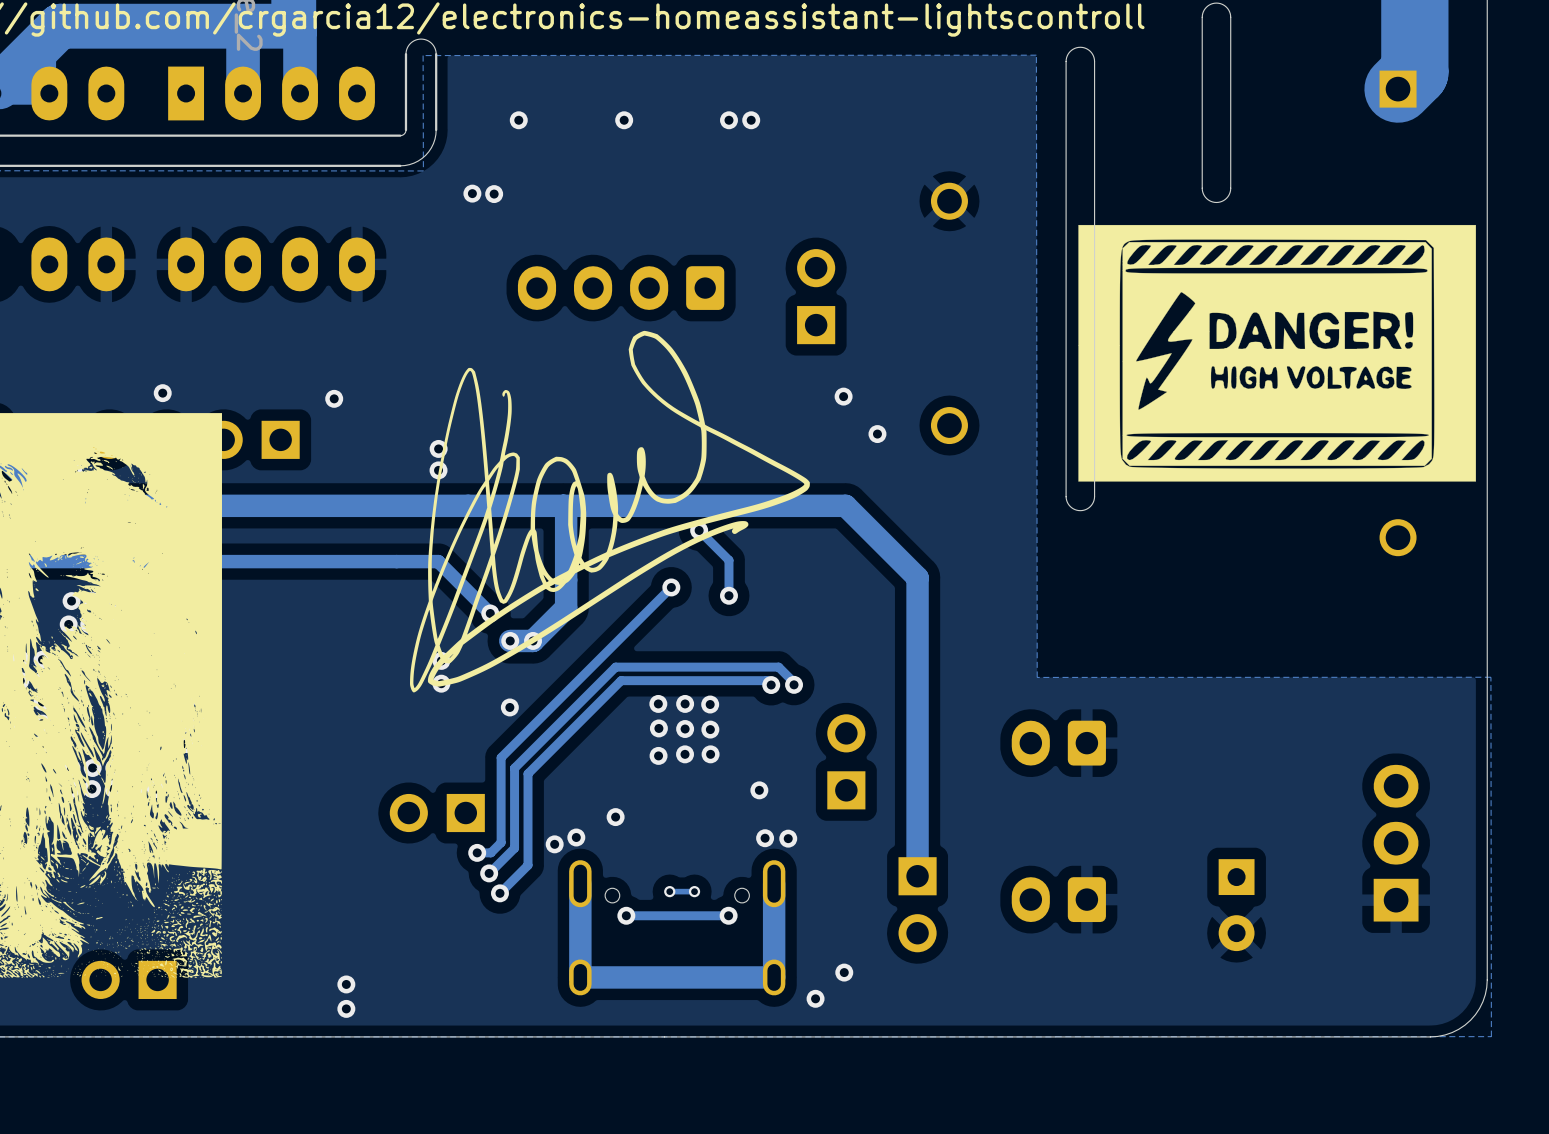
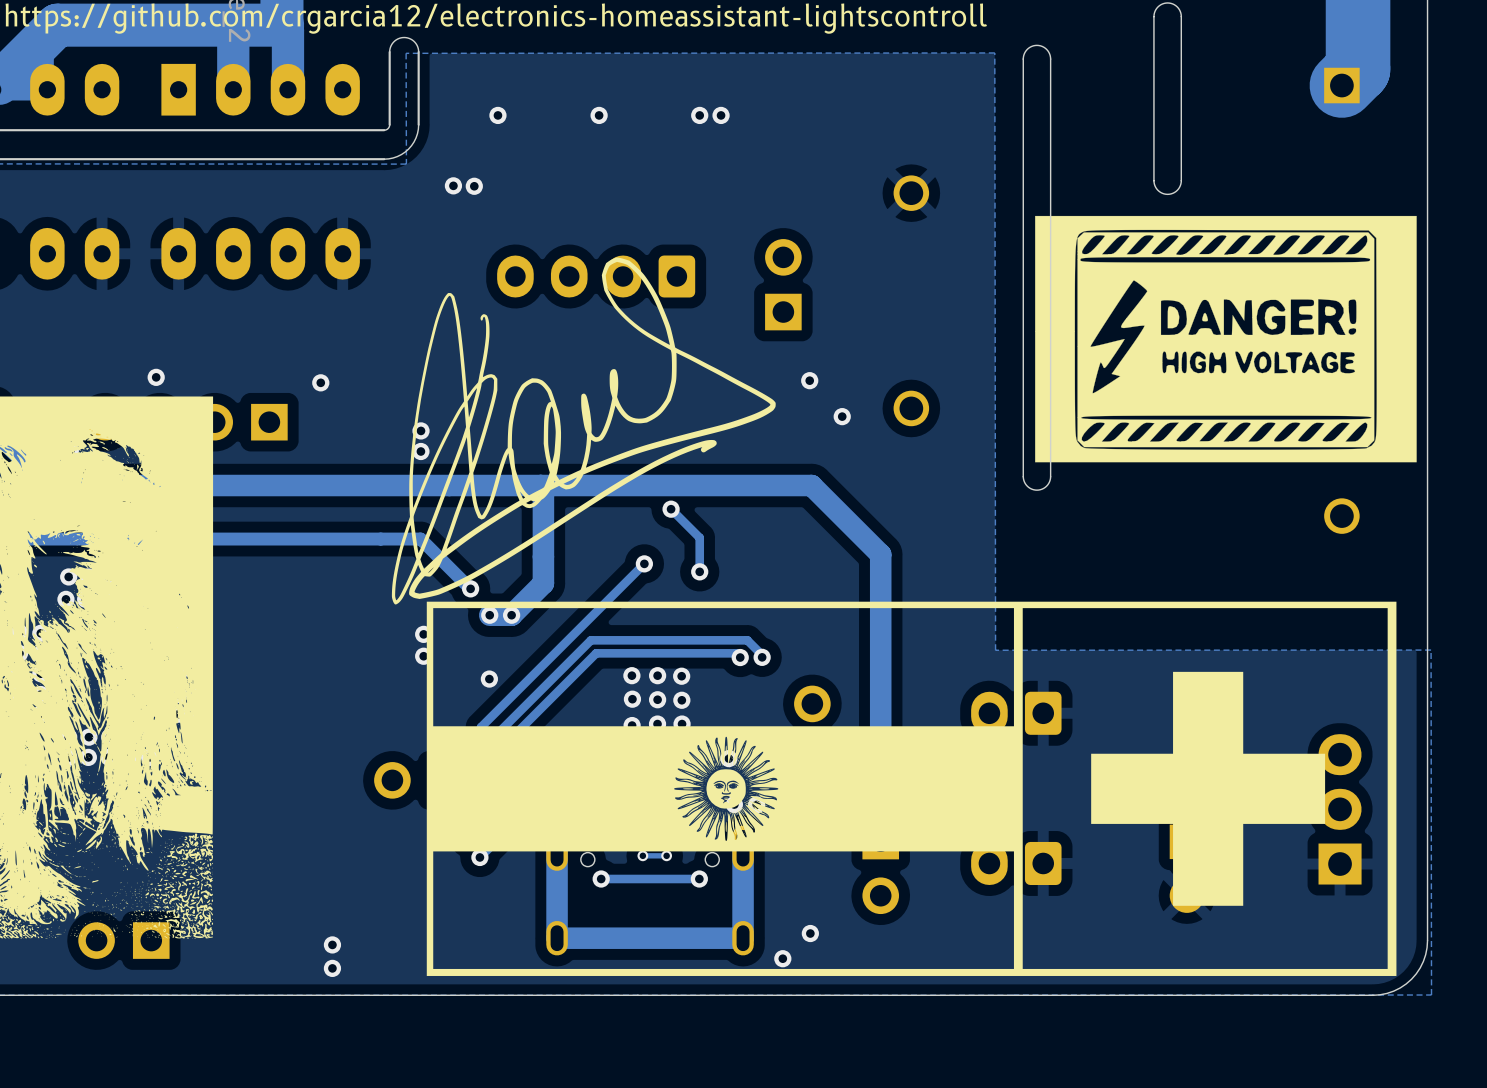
drawing position: (609, 511) -> (583, 430)
part: none -> (911, 788)

